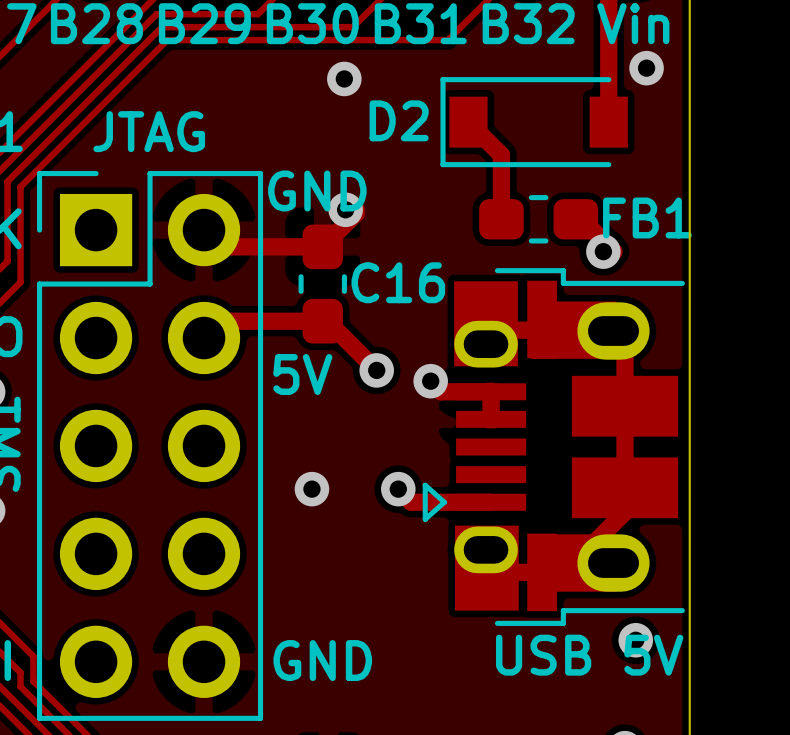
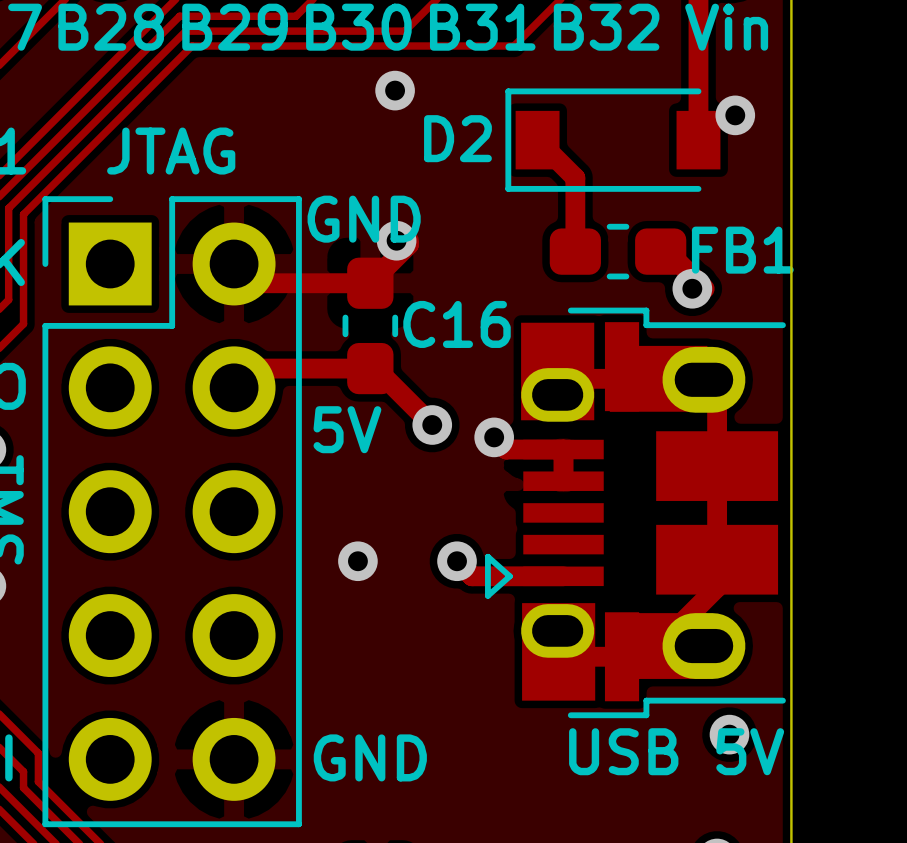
via position: (646, 68) -> (735, 115)

